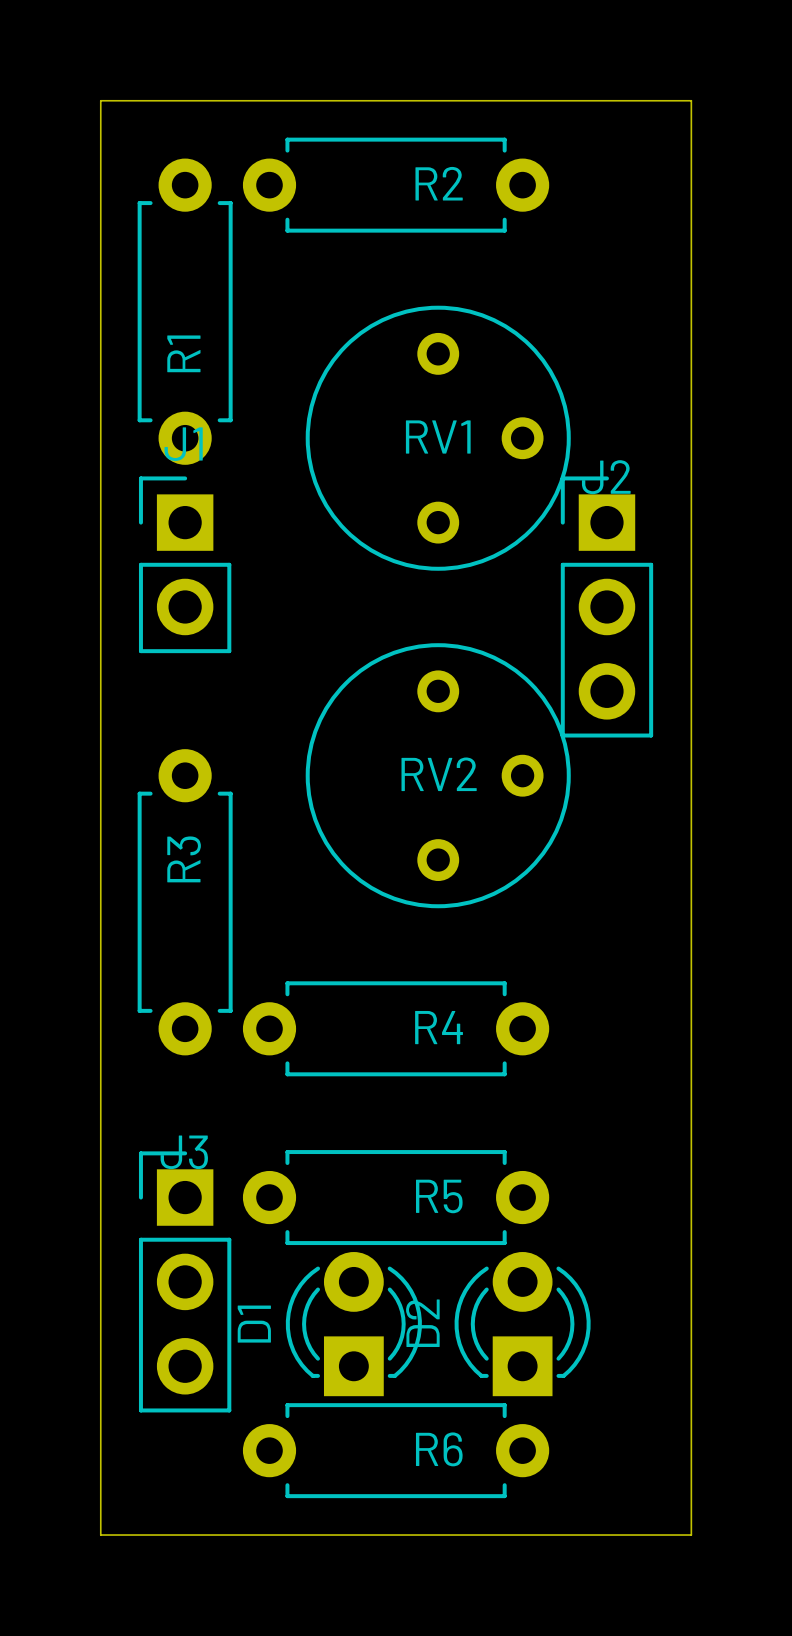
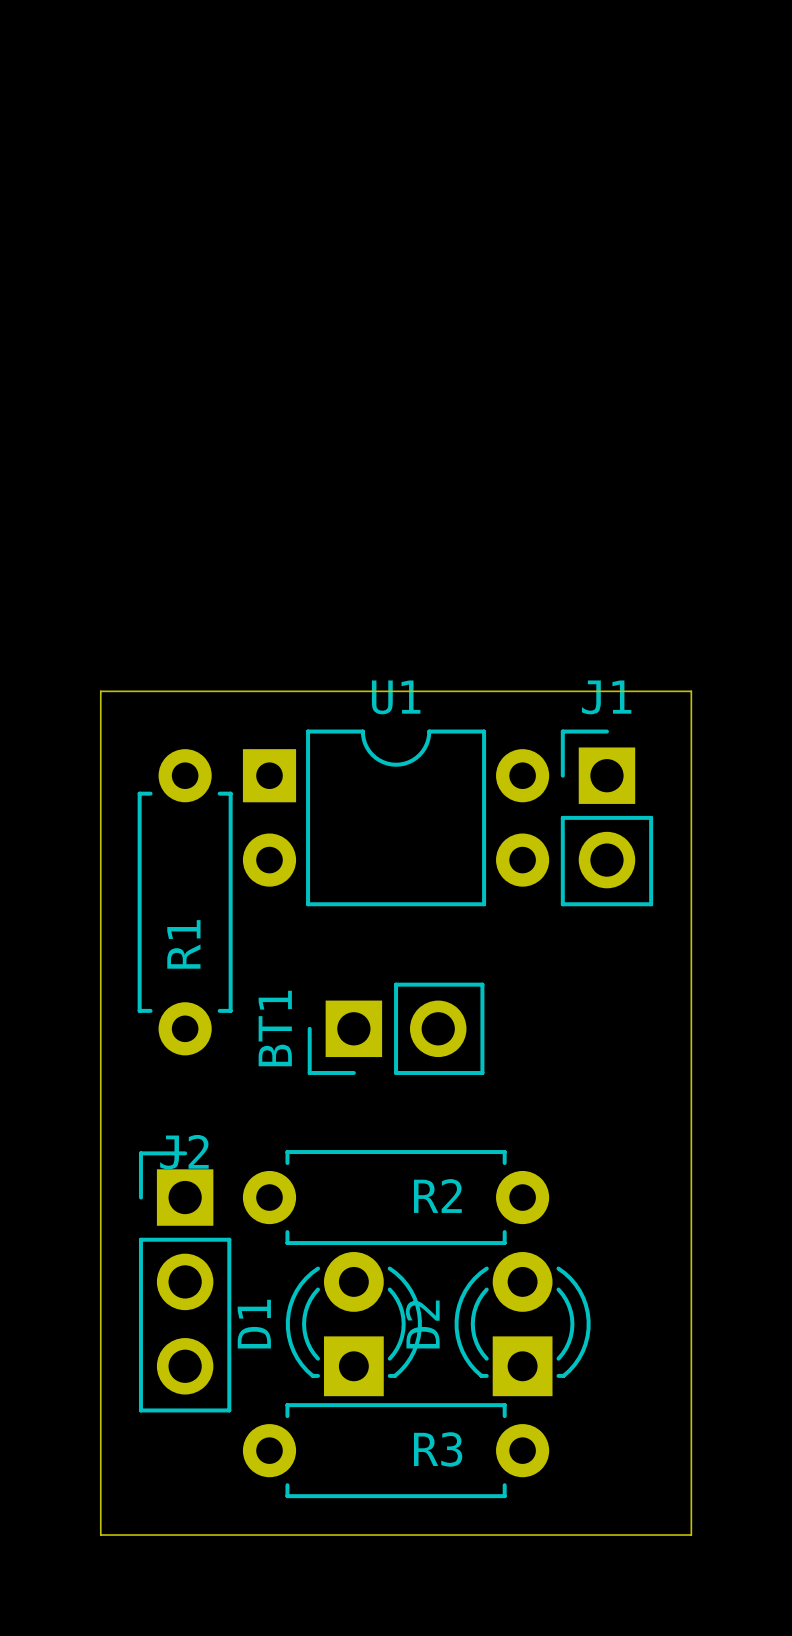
R2: (396, 185) -> none
R1: (185, 311) -> none
RV1: (438, 438) -> none
J1 position: (185, 564) -> (606, 817)
J2: (606, 606) -> none
board edge: (100, 691) (100, 100) (691, 100) (691, 691) -> (100, 691) (691, 691)
RV2: (438, 775) -> none
U1: none -> (396, 817)
R3 name: R3 (184, 859) -> R1 (183, 944)
R4: (396, 1028) -> none
BT1: none -> (396, 1028)
J3 name: J3 (184, 1152) -> J2 (184, 1152)
R5 name: R5 (439, 1196) -> R2 (437, 1196)
R6 name: R6 (439, 1449) -> R3 (438, 1449)

